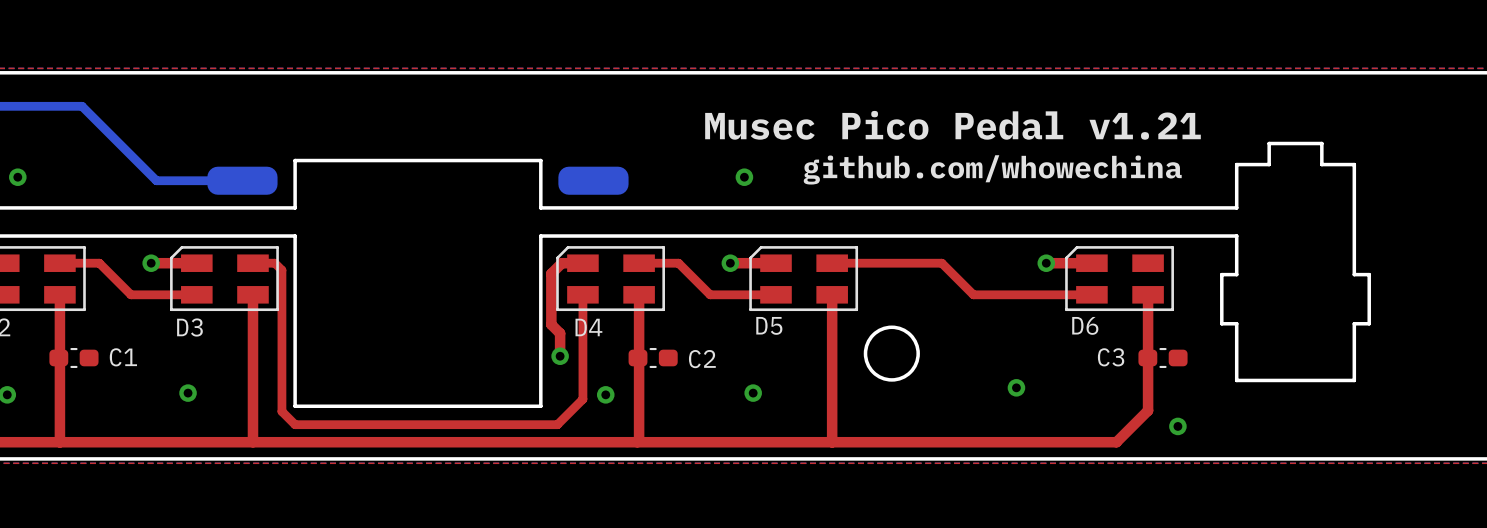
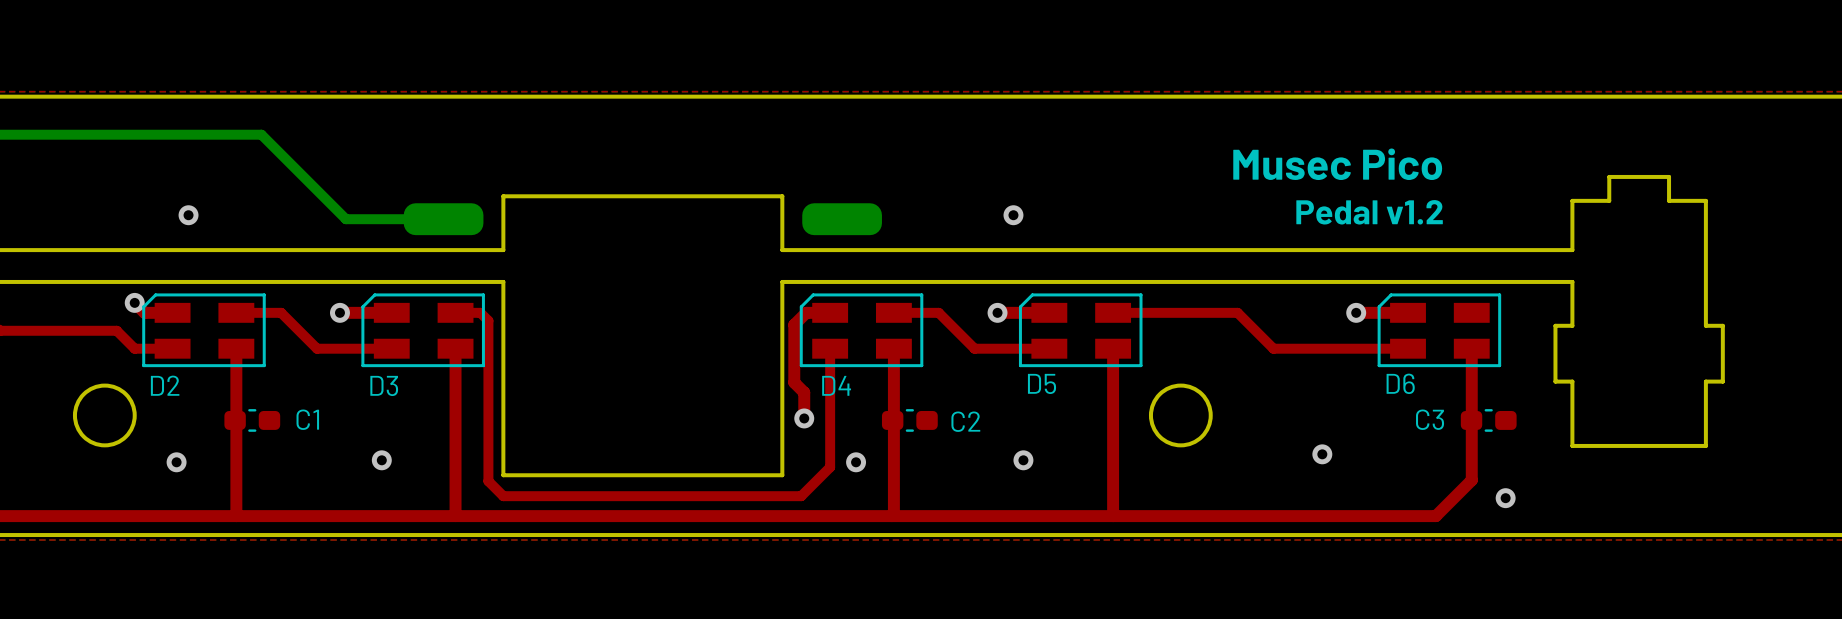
text: Musec Pico Pedal v1.21 (952, 125) -> none
text: none -> Musec Pico (1337, 164)
text: github.com/whowechina (992, 169) -> none
text: none -> Pedal v1.2 (1369, 212)

